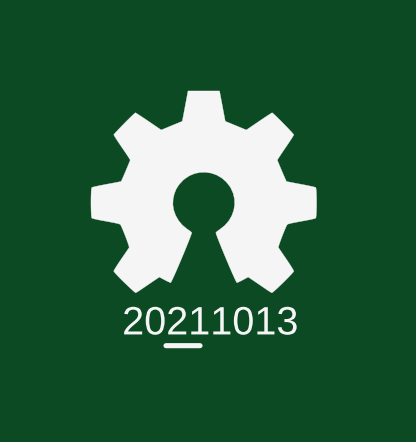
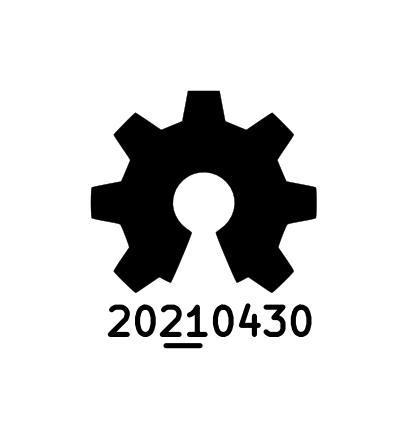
drawing shape: [124, 306, 297, 349] -> [107, 303, 312, 349]

